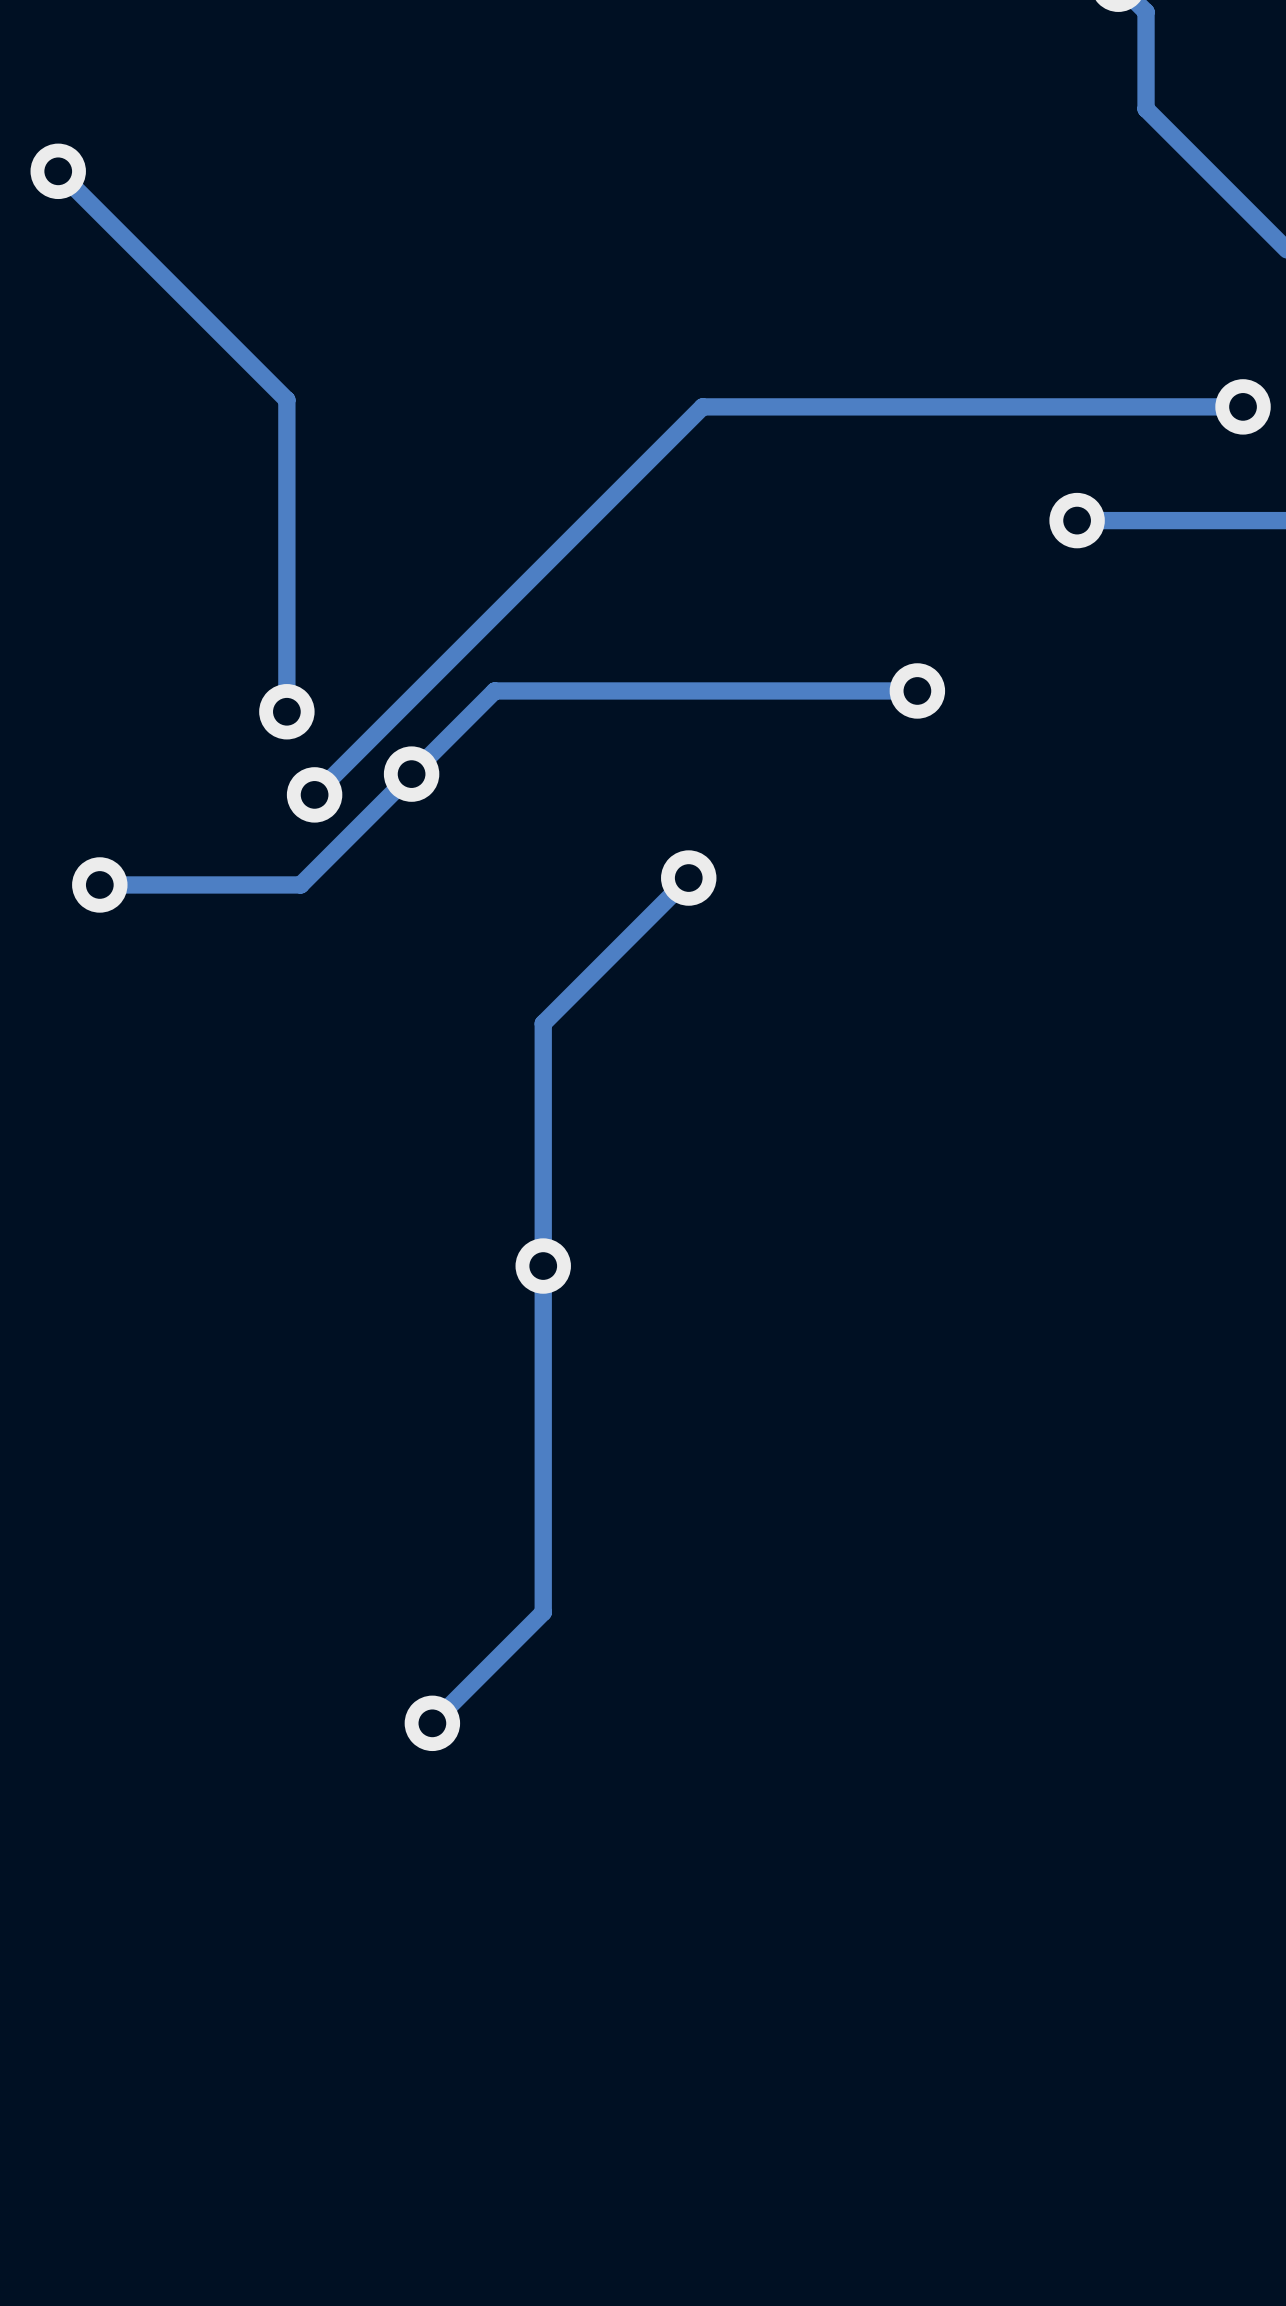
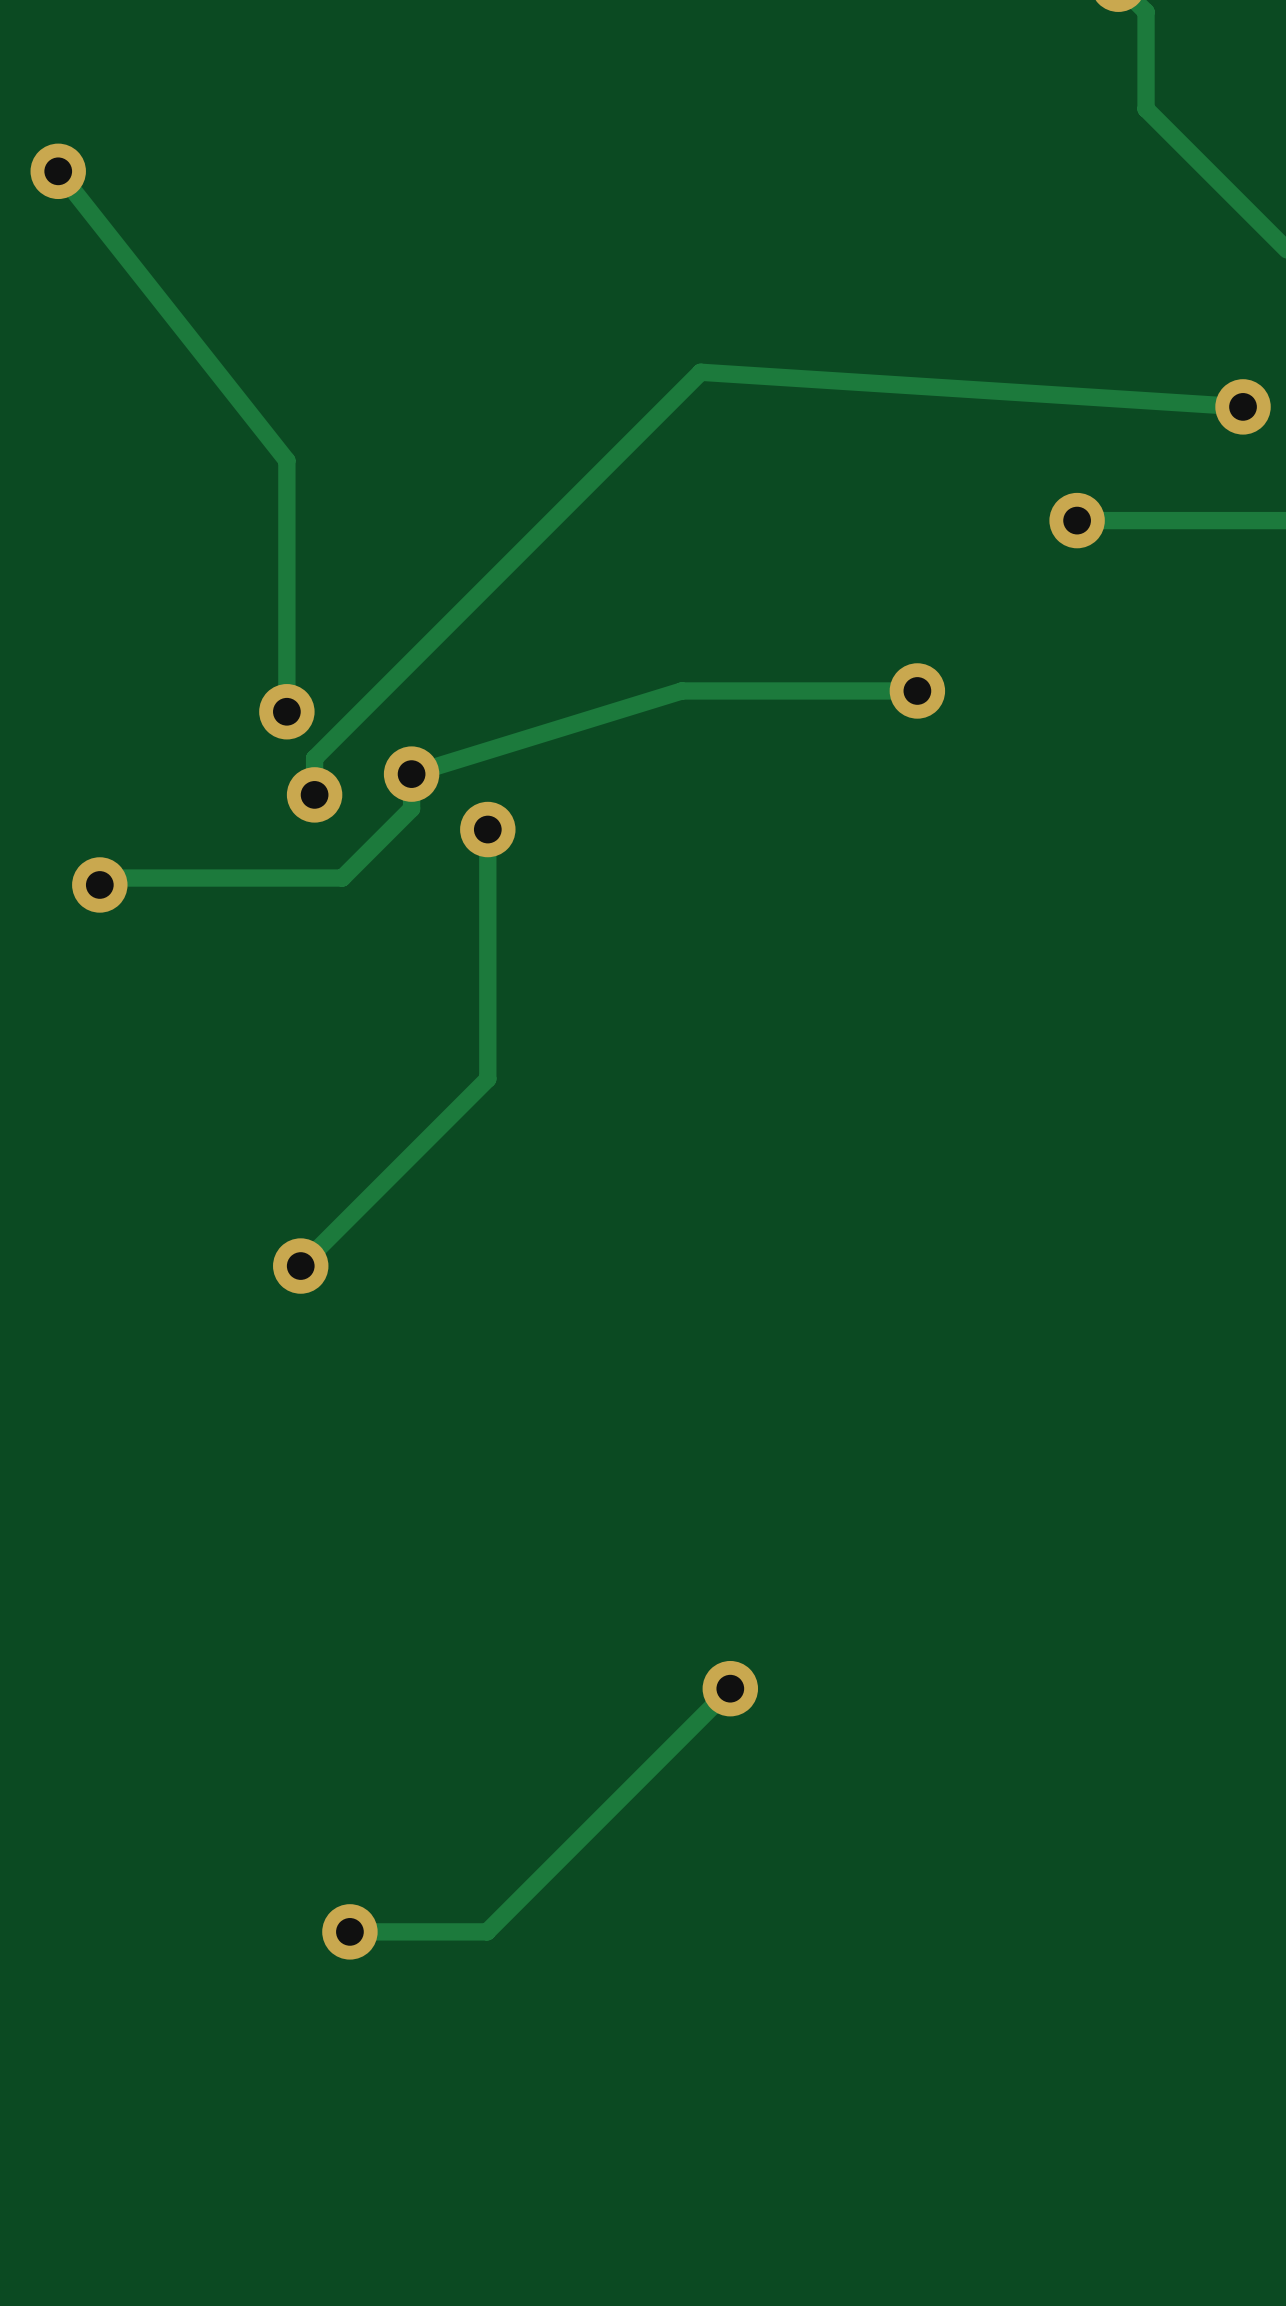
track: (58, 171) (286, 399) (286, 460) -> (58, 171) (286, 460)
track: (1243, 406) (702, 406) (314, 794) -> (1243, 406) (700, 372) (314, 758) (314, 794)
track: (681, 690) (494, 690) (300, 884) (99, 884) -> (681, 690) (411, 774) (411, 808) (342, 878) (106, 878) (99, 884)
track: none -> (487, 829) (487, 1078) (300, 1266)
track: (688, 878) (543, 1023) (543, 1612) (432, 1723) -> none
via position: (688, 878) -> (487, 829)
via: none -> (300, 1266)
via: (543, 1266) -> none
track: none -> (730, 1688) (487, 1931) (349, 1931)
via: none -> (730, 1688)
via: (432, 1723) -> none
via: none -> (349, 1931)

